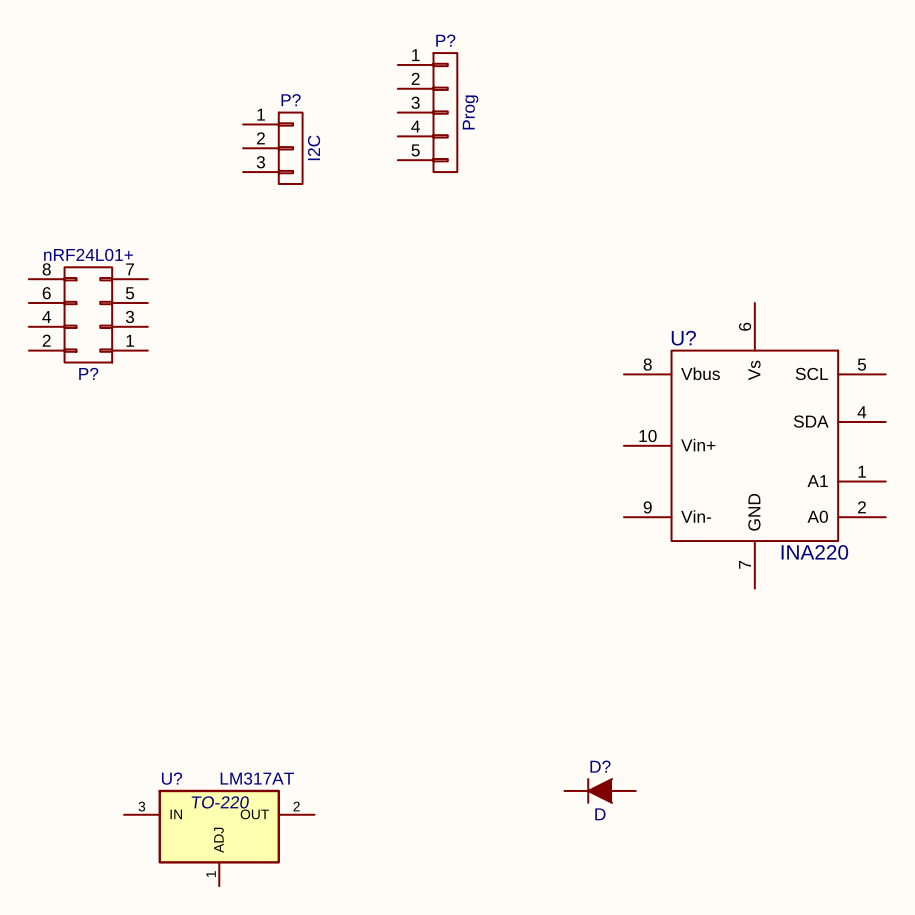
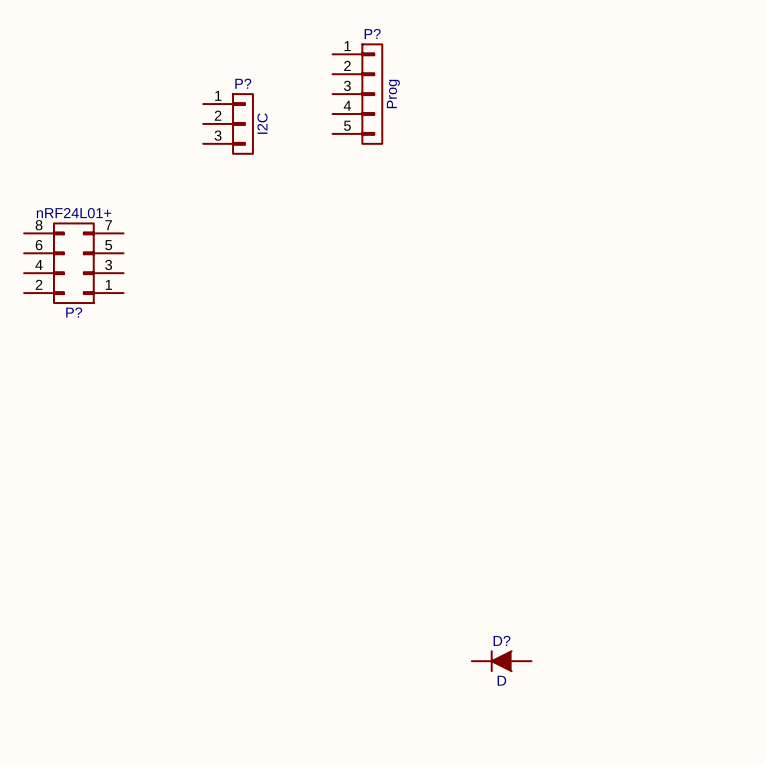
U?: INA220 (754, 445) -> none
U?: LM317AT (219, 837) -> none

